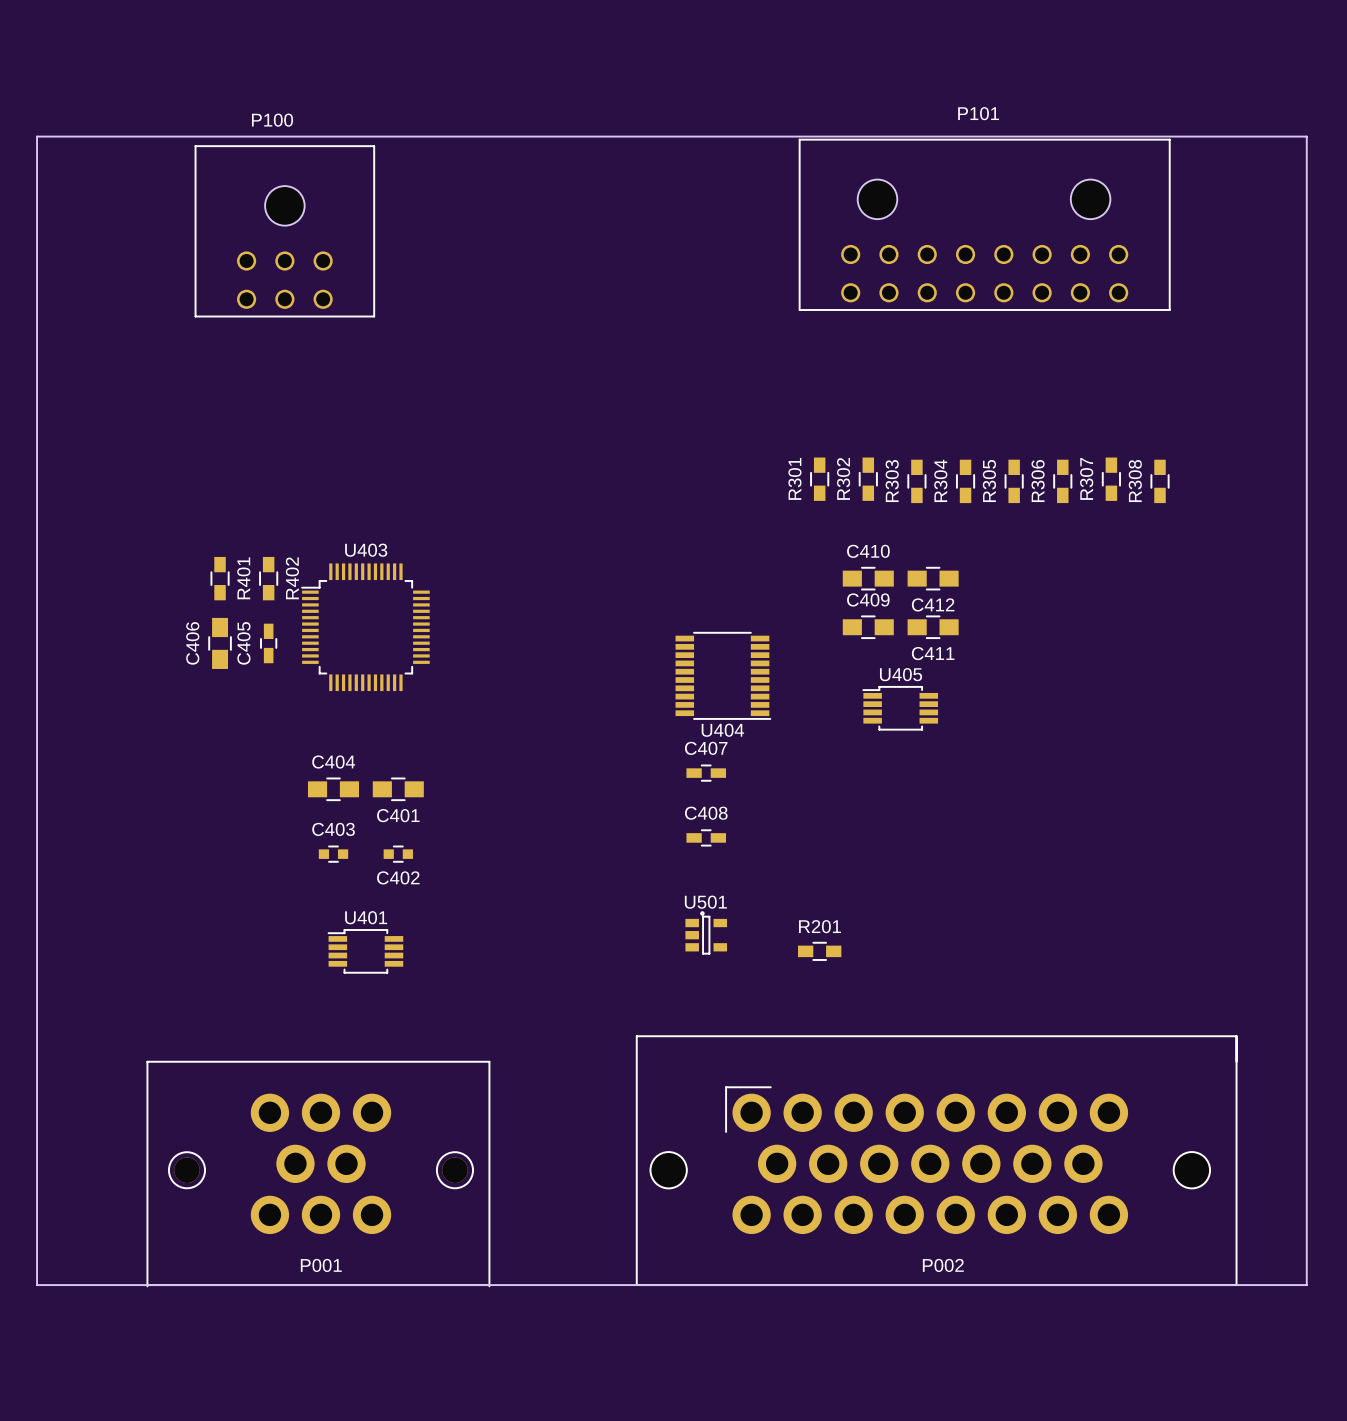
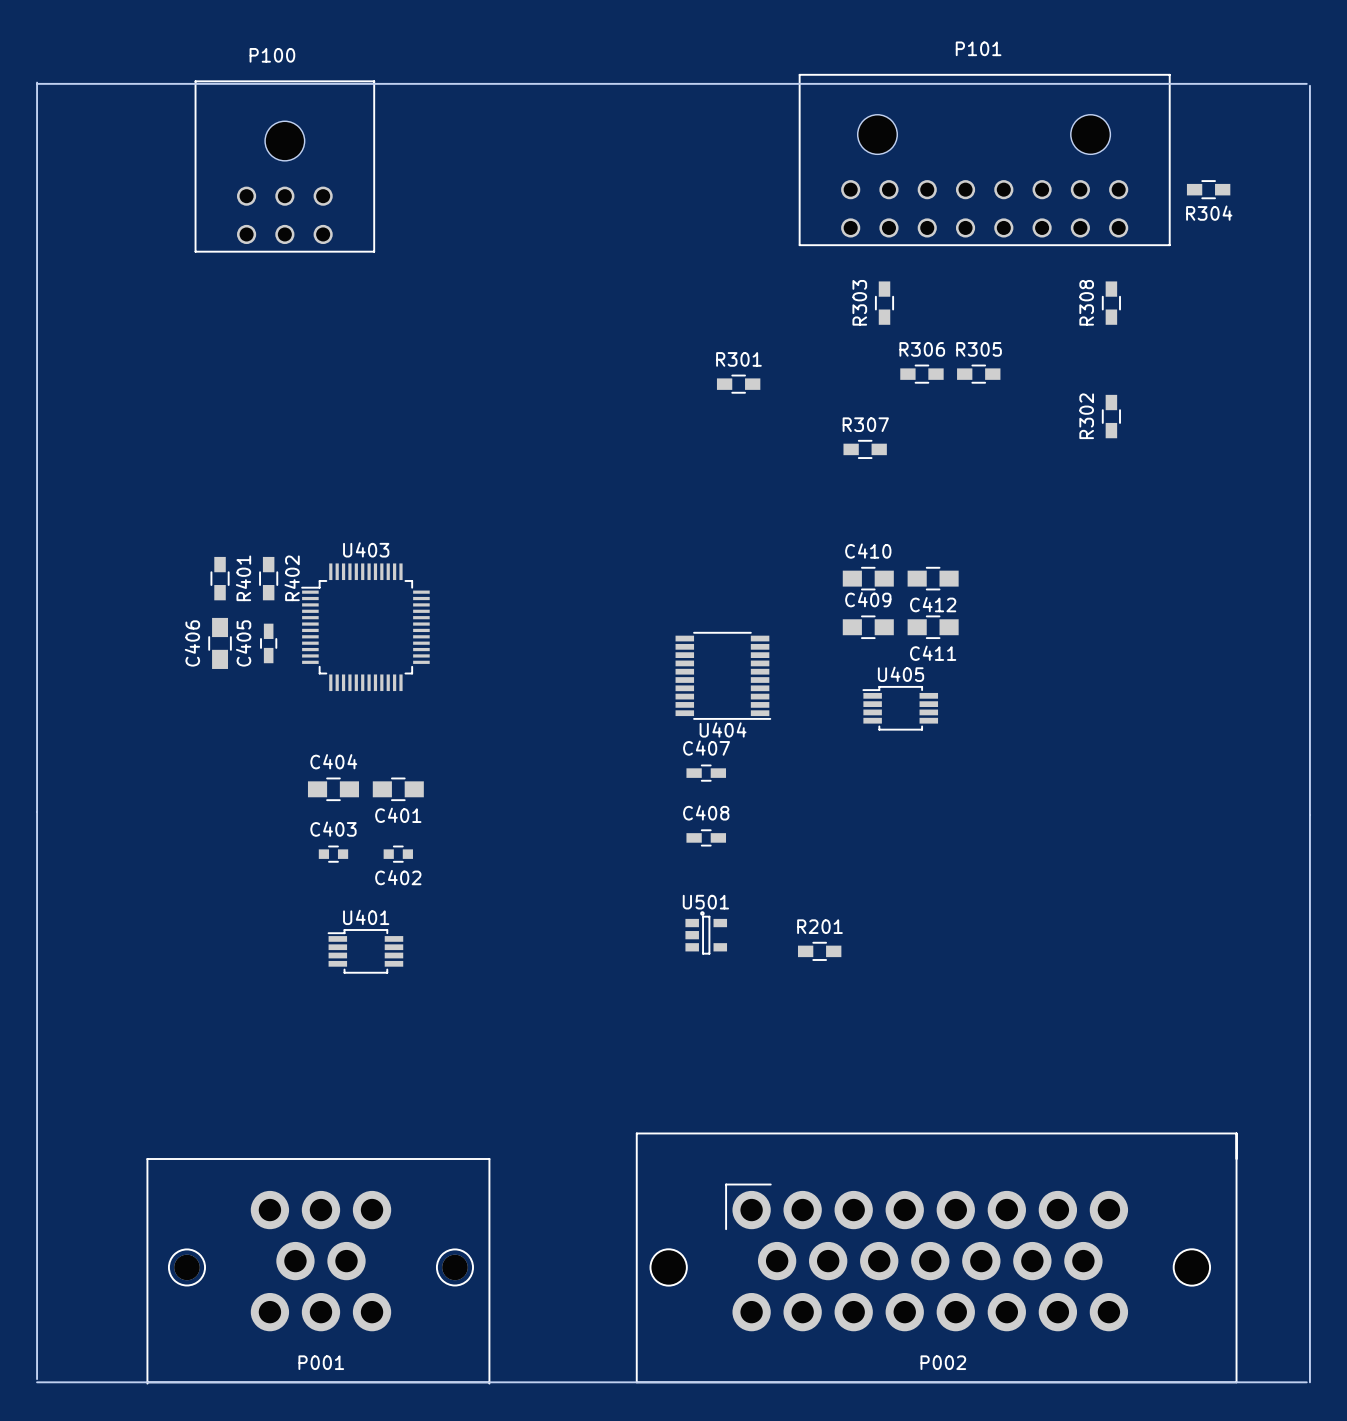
board edge: none -> (37, 83) (1306, 83)
board edge: none -> (1309, 85) (1309, 1382)
board edge: (37, 136) (1306, 136) (1306, 1285) (37, 1285) -> (37, 136) (37, 82)
P101 position: (984, 224) -> (984, 160)
P100 position: (284, 231) -> (284, 166)
R301 rotation: 0° (819, 479) -> 90° clockwise (738, 384)
R301 position: (819, 479) -> (738, 384)
R302 position: (868, 479) -> (1111, 416)
R307 rotation: 0° (1111, 479) -> 90° clockwise (865, 449)
R307 position: (1111, 479) -> (865, 449)
R304 name position: R304 (940, 480) -> R304 (1209, 213)
R303 position: (916, 481) -> (884, 303)
R304 rotation: 0° (965, 481) -> 90° clockwise (1208, 189)
R304 position: (965, 481) -> (1208, 189)
R305 rotation: 0° (1014, 481) -> 90° clockwise (978, 374)
R305 position: (1014, 481) -> (978, 374)
R306 rotation: 0° (1062, 481) -> 90° clockwise (921, 374)
R306 position: (1062, 481) -> (921, 374)
R308 position: (1160, 481) -> (1111, 303)
P002 position: (936, 1160) -> (936, 1257)
P001 position: (318, 1174) -> (318, 1271)
board edge: none -> (37, 1285) (37, 1379)
board edge: none -> (37, 1382) (1306, 1382)

